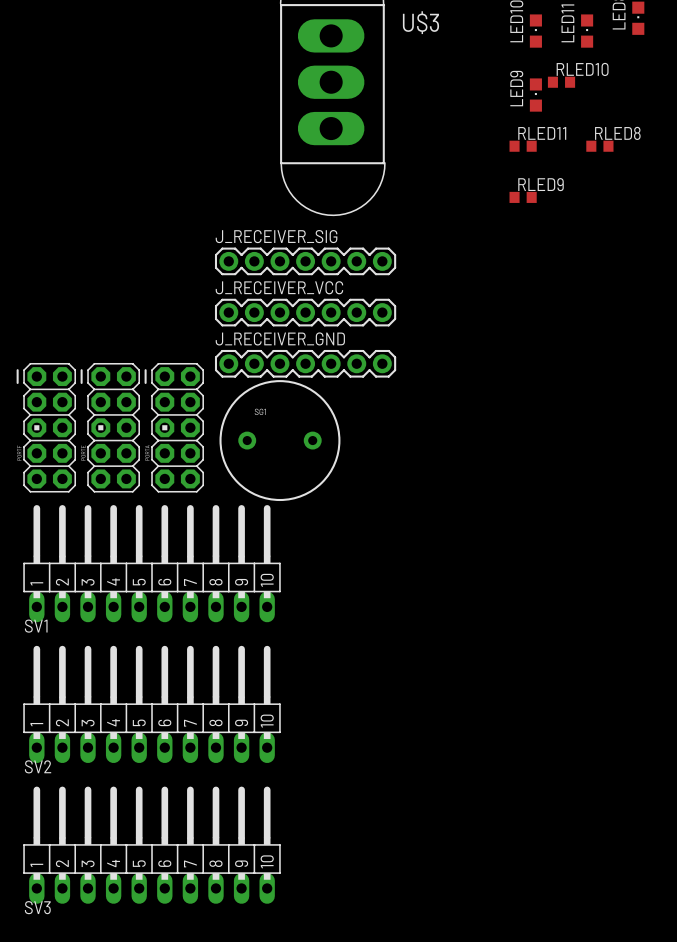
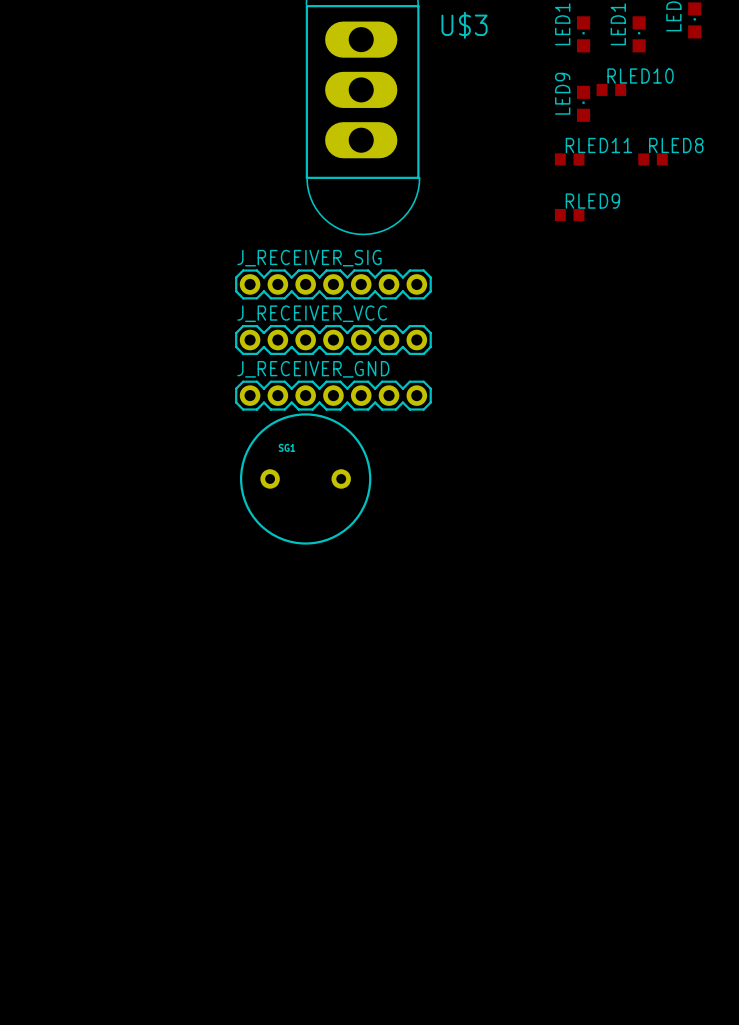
part: (46, 427) -> none
part: (110, 427) -> none
part: (174, 427) -> none
SV1: (152, 563) -> none
SV2: (152, 704) -> none
SV3: (152, 845) -> none

